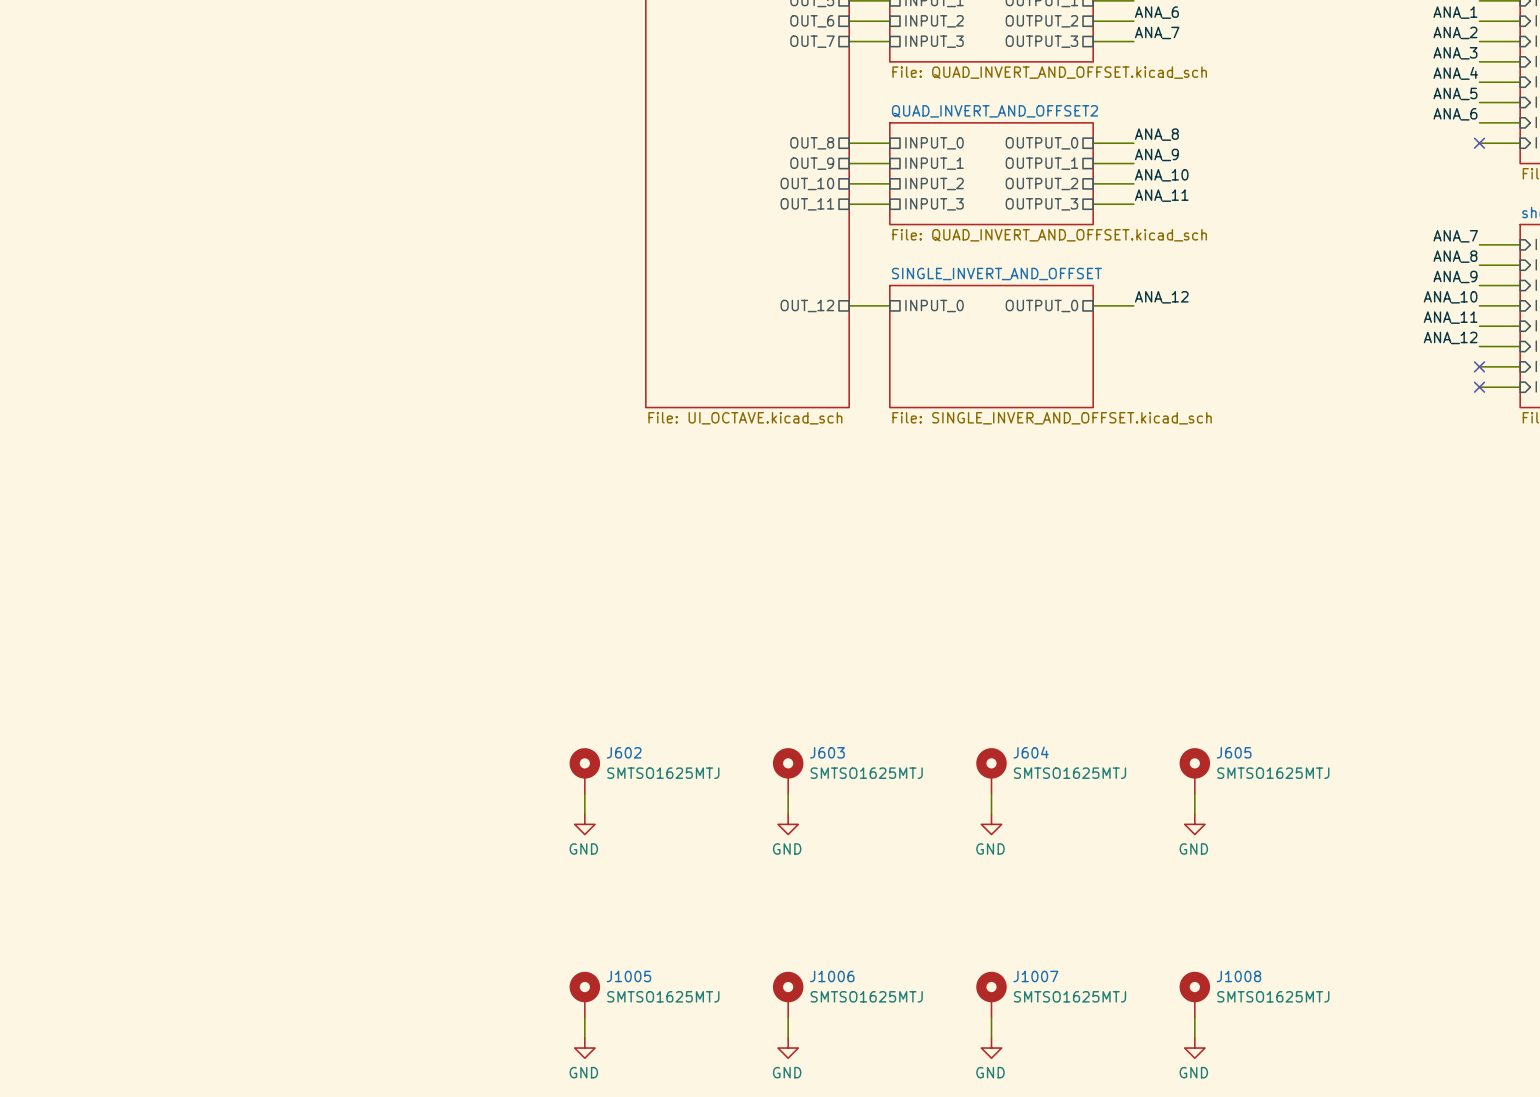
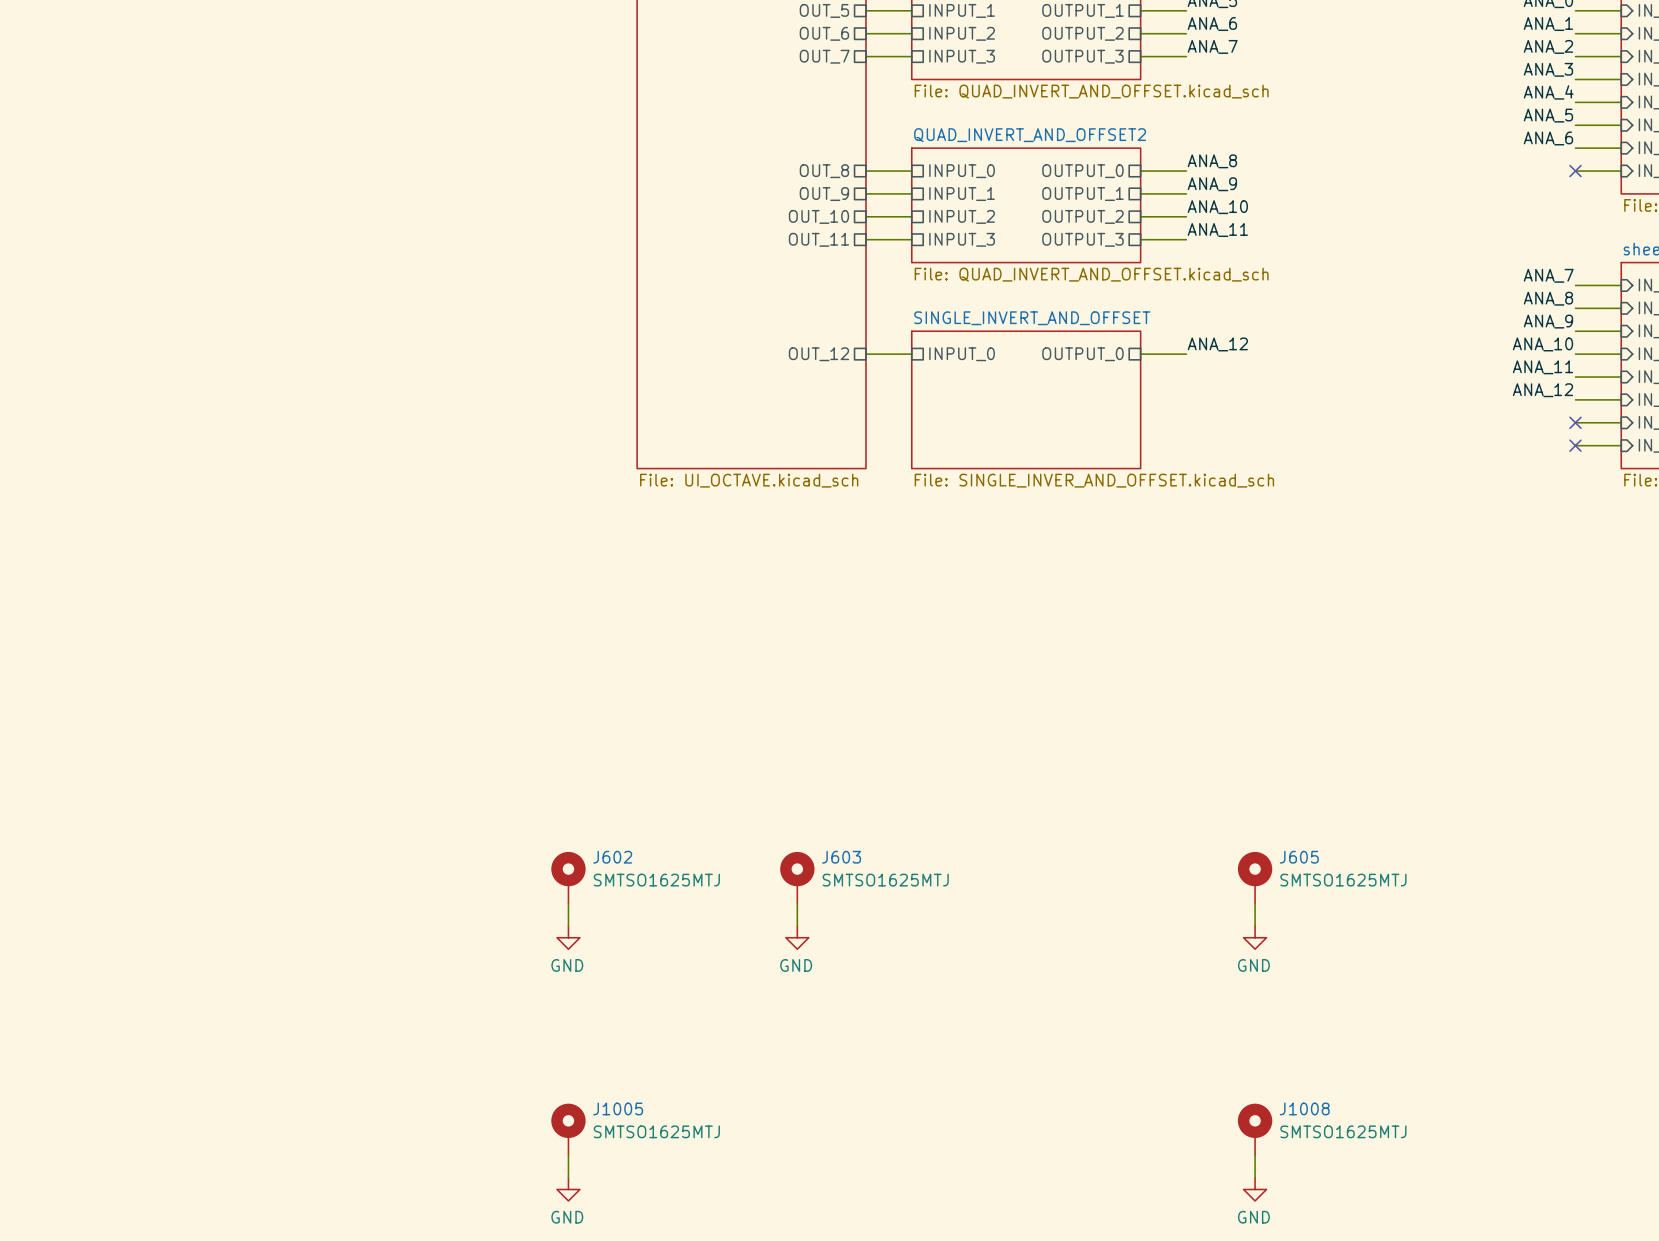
J604: SMTSO1625MTJ (991, 770) -> none
wire: (991, 793) (991, 814) -> none
power symbol: GND (991, 824) -> none
J1006: SMTSO1625MTJ (788, 994) -> none
J1007: SMTSO1625MTJ (991, 994) -> none
wire: (788, 1017) (788, 1037) -> none
wire: (991, 1017) (991, 1037) -> none
power symbol: GND (788, 1048) -> none
power symbol: GND (991, 1048) -> none

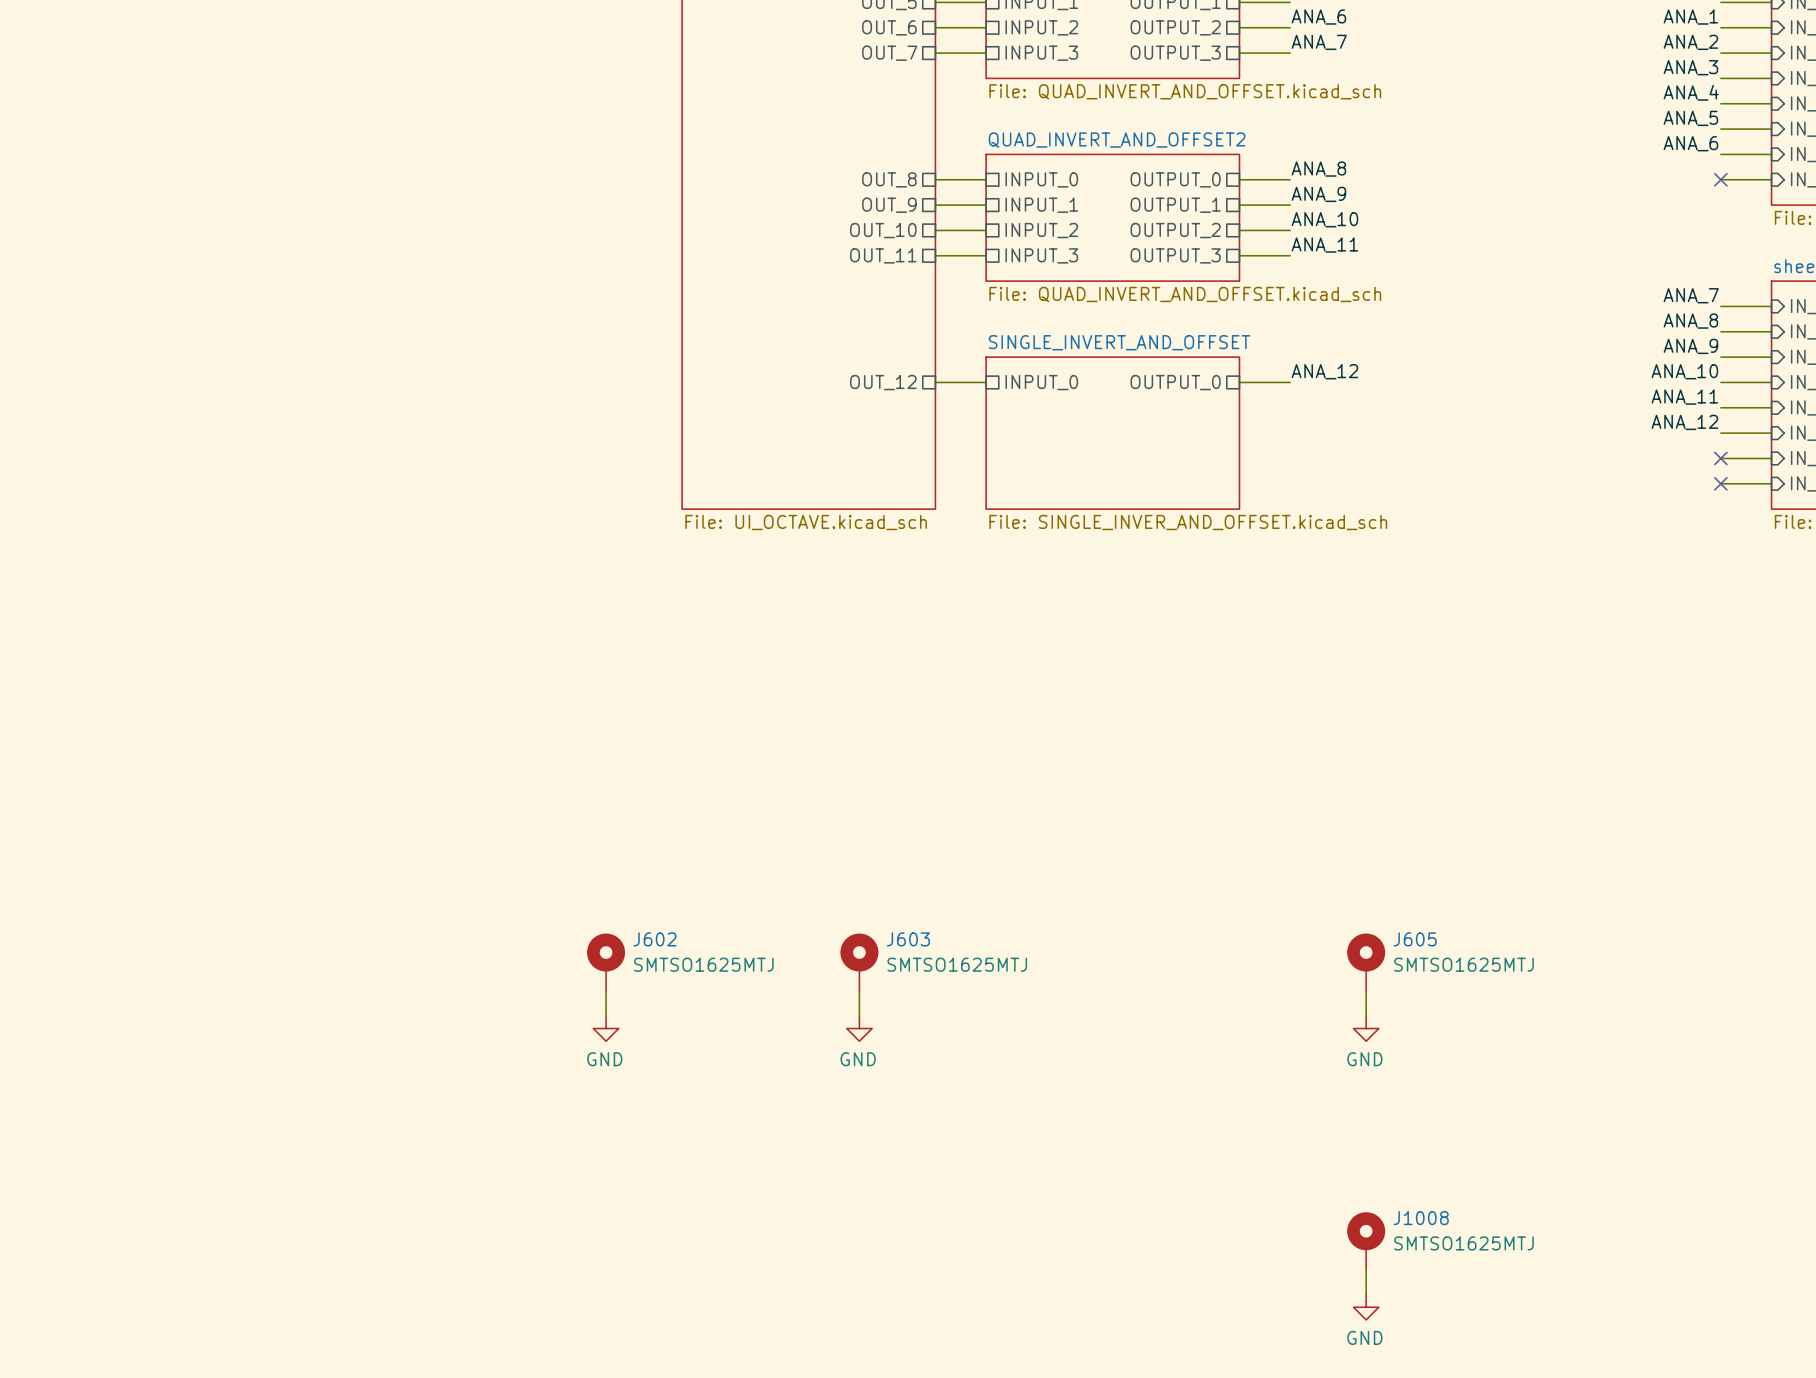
J1005: SMTSO1625MTJ (568, 1129) -> none
wire: (568, 1155) (568, 1178) -> none
power symbol: GND (568, 1189) -> none

